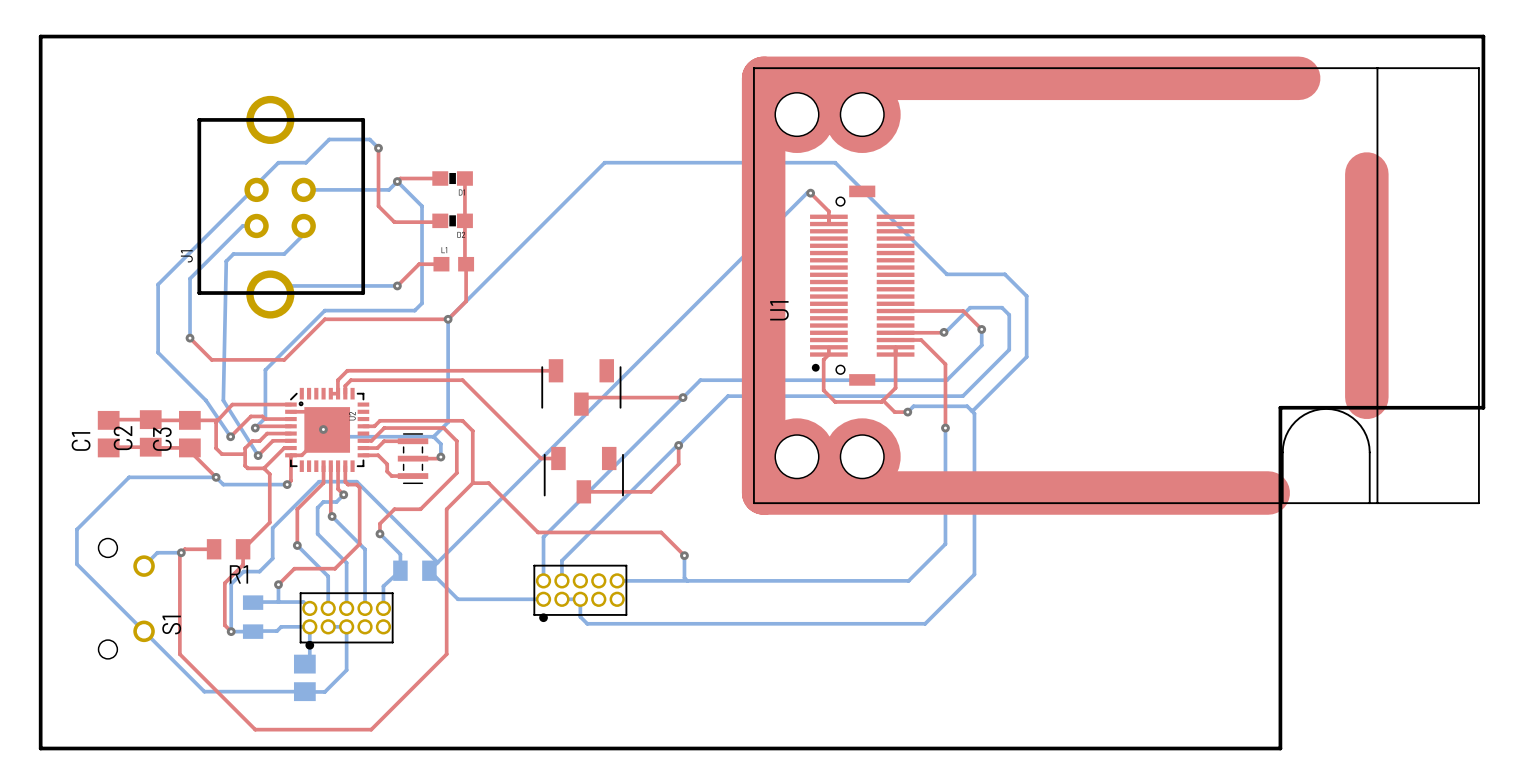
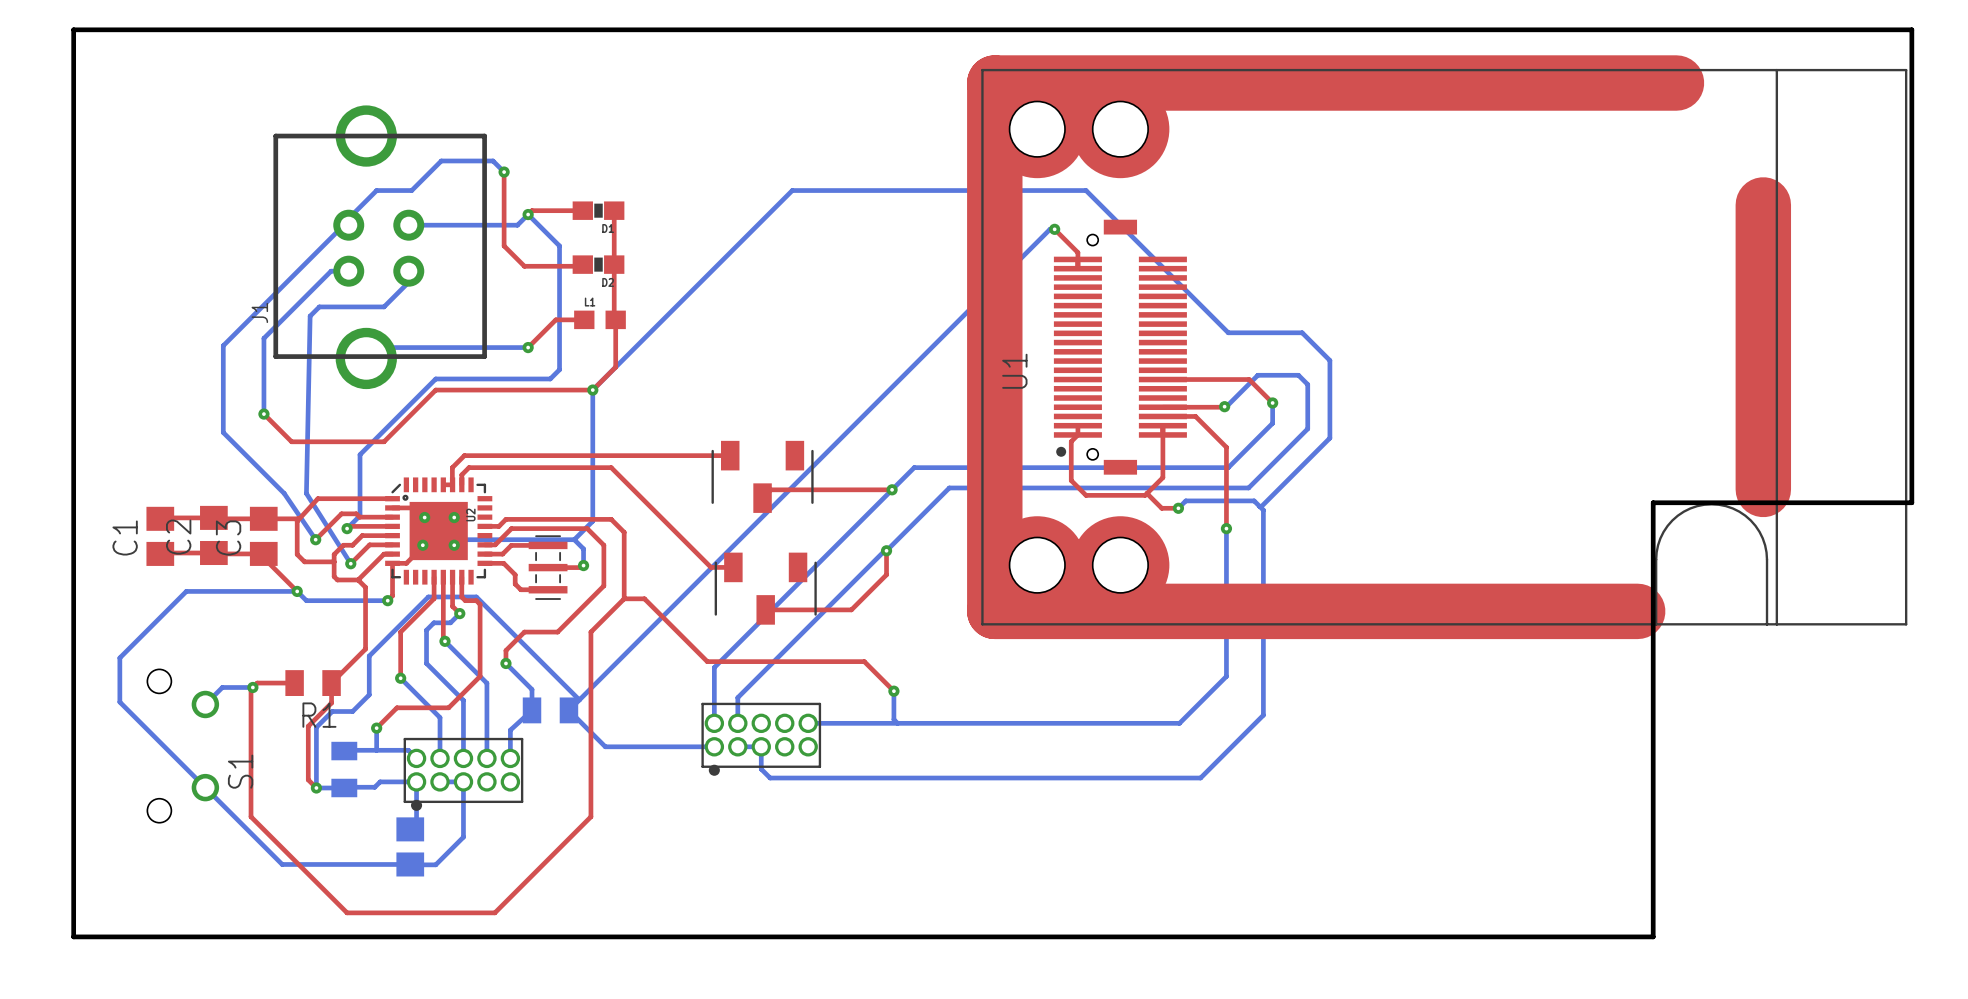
via: none -> (424, 517)
via: none -> (454, 517)
via: (323, 429) -> none
via: none -> (422, 545)
via: none -> (454, 545)

